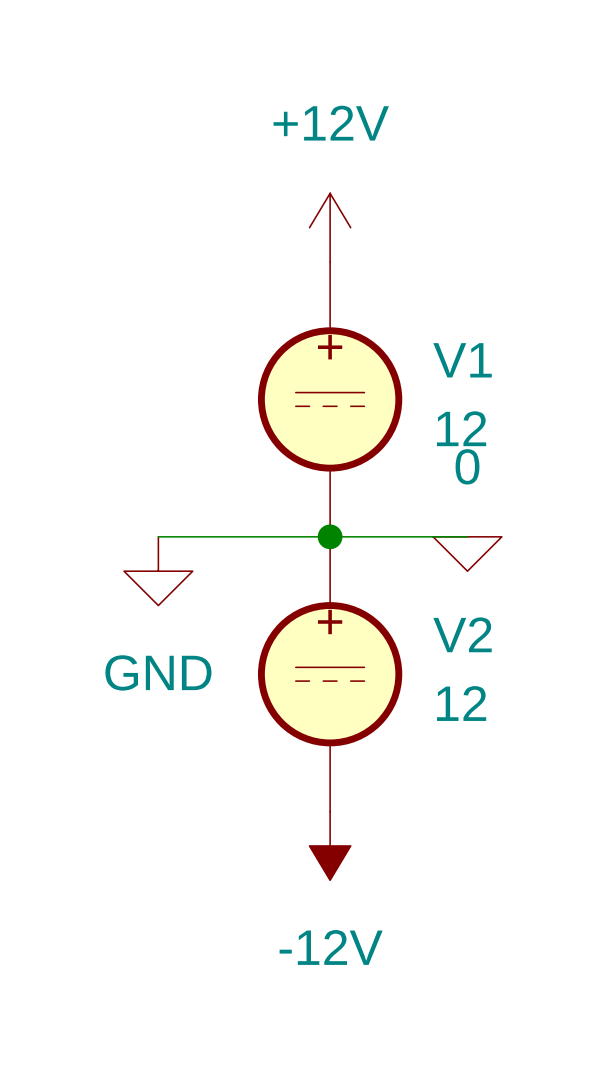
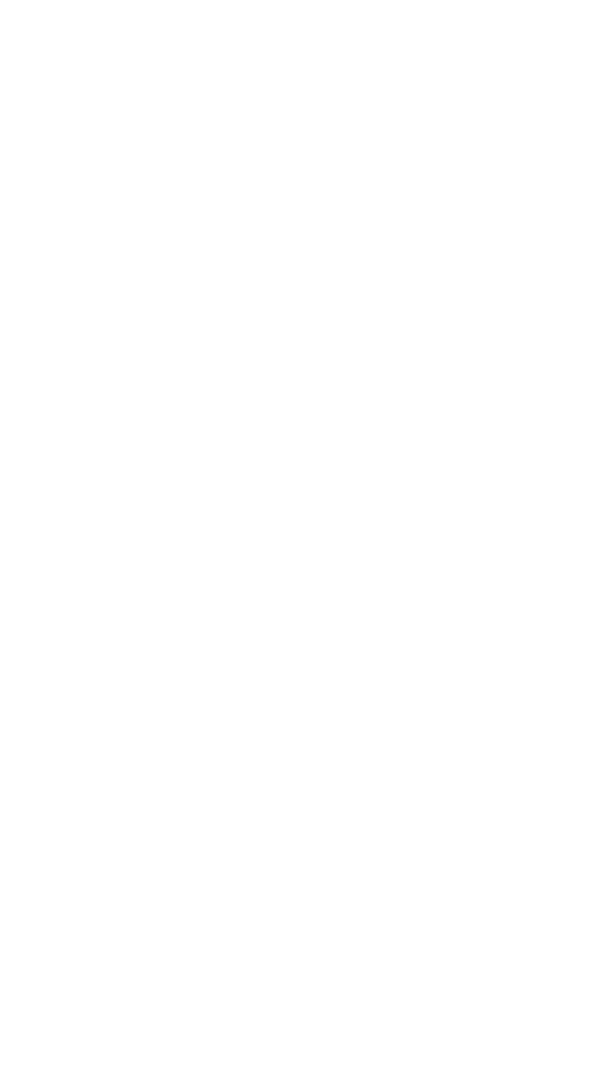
power symbol: +12V (330, 227) -> none
V1: 12 (330, 399) -> none
wire: (158, 536) (467, 536) -> none
junction: (330, 536) -> none
power symbol: 0 (467, 554) -> none
power symbol: GND (158, 571) -> none
V2: 12 (330, 674) -> none
power symbol: -12V (330, 845) -> none

